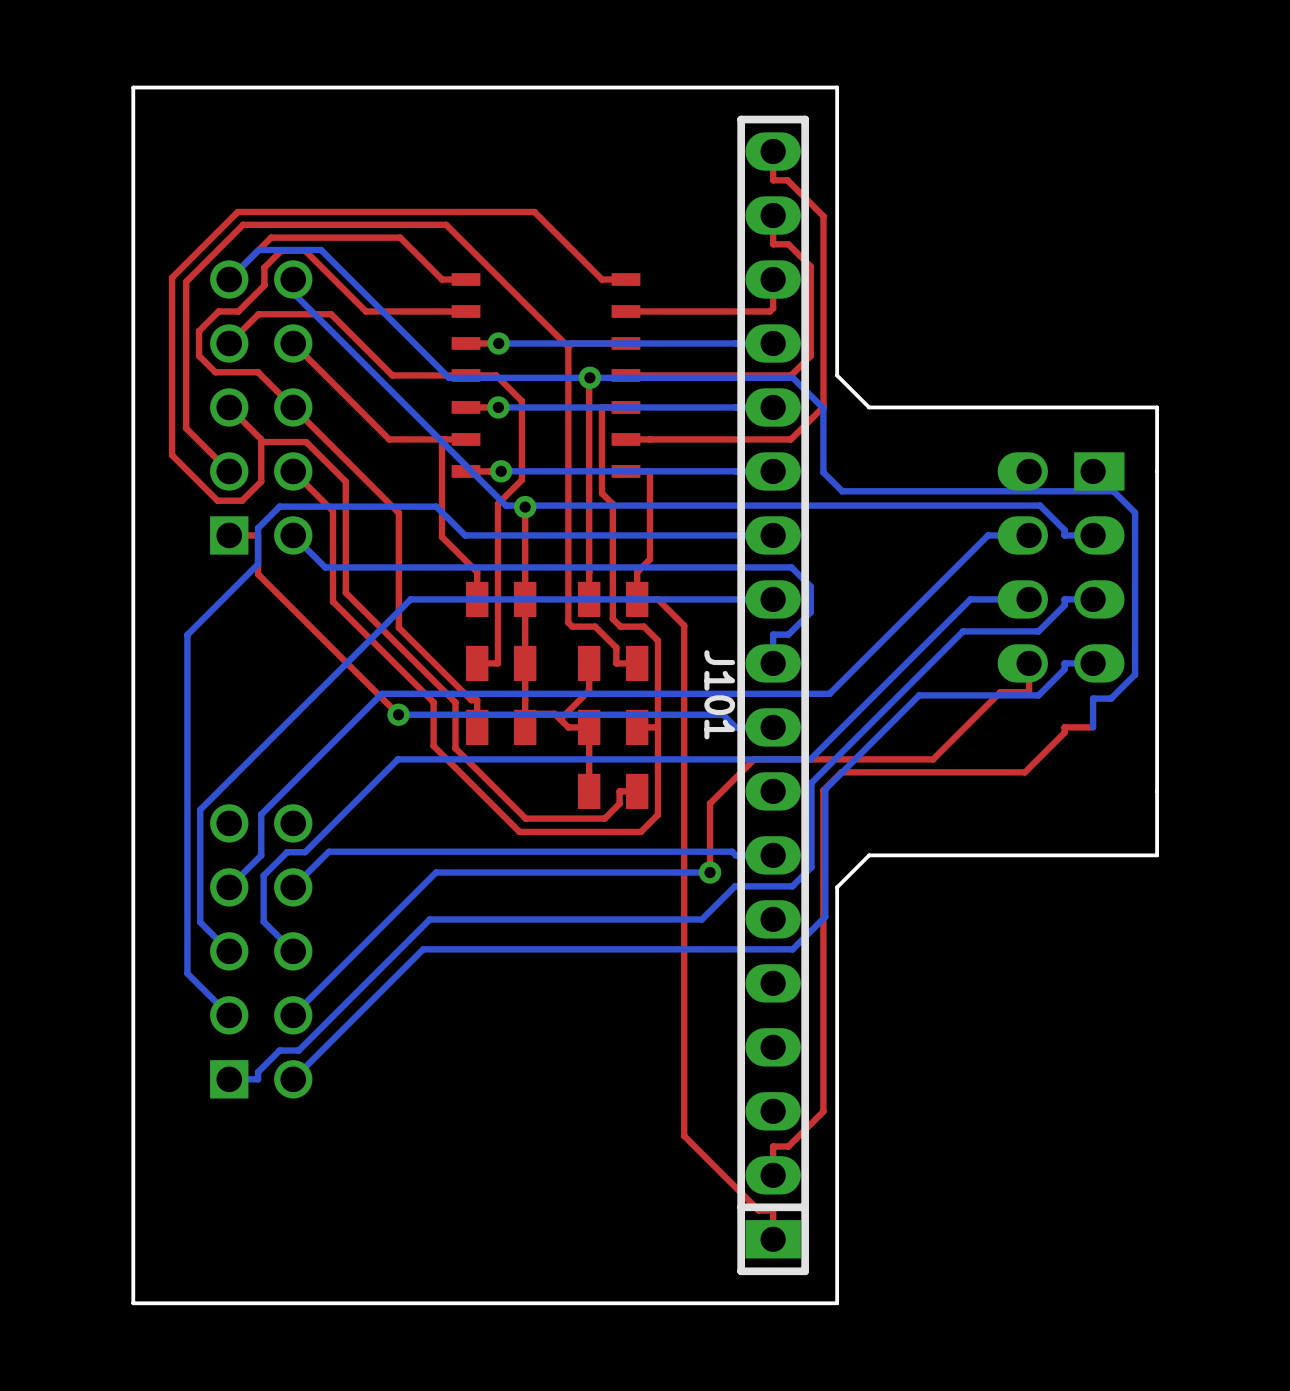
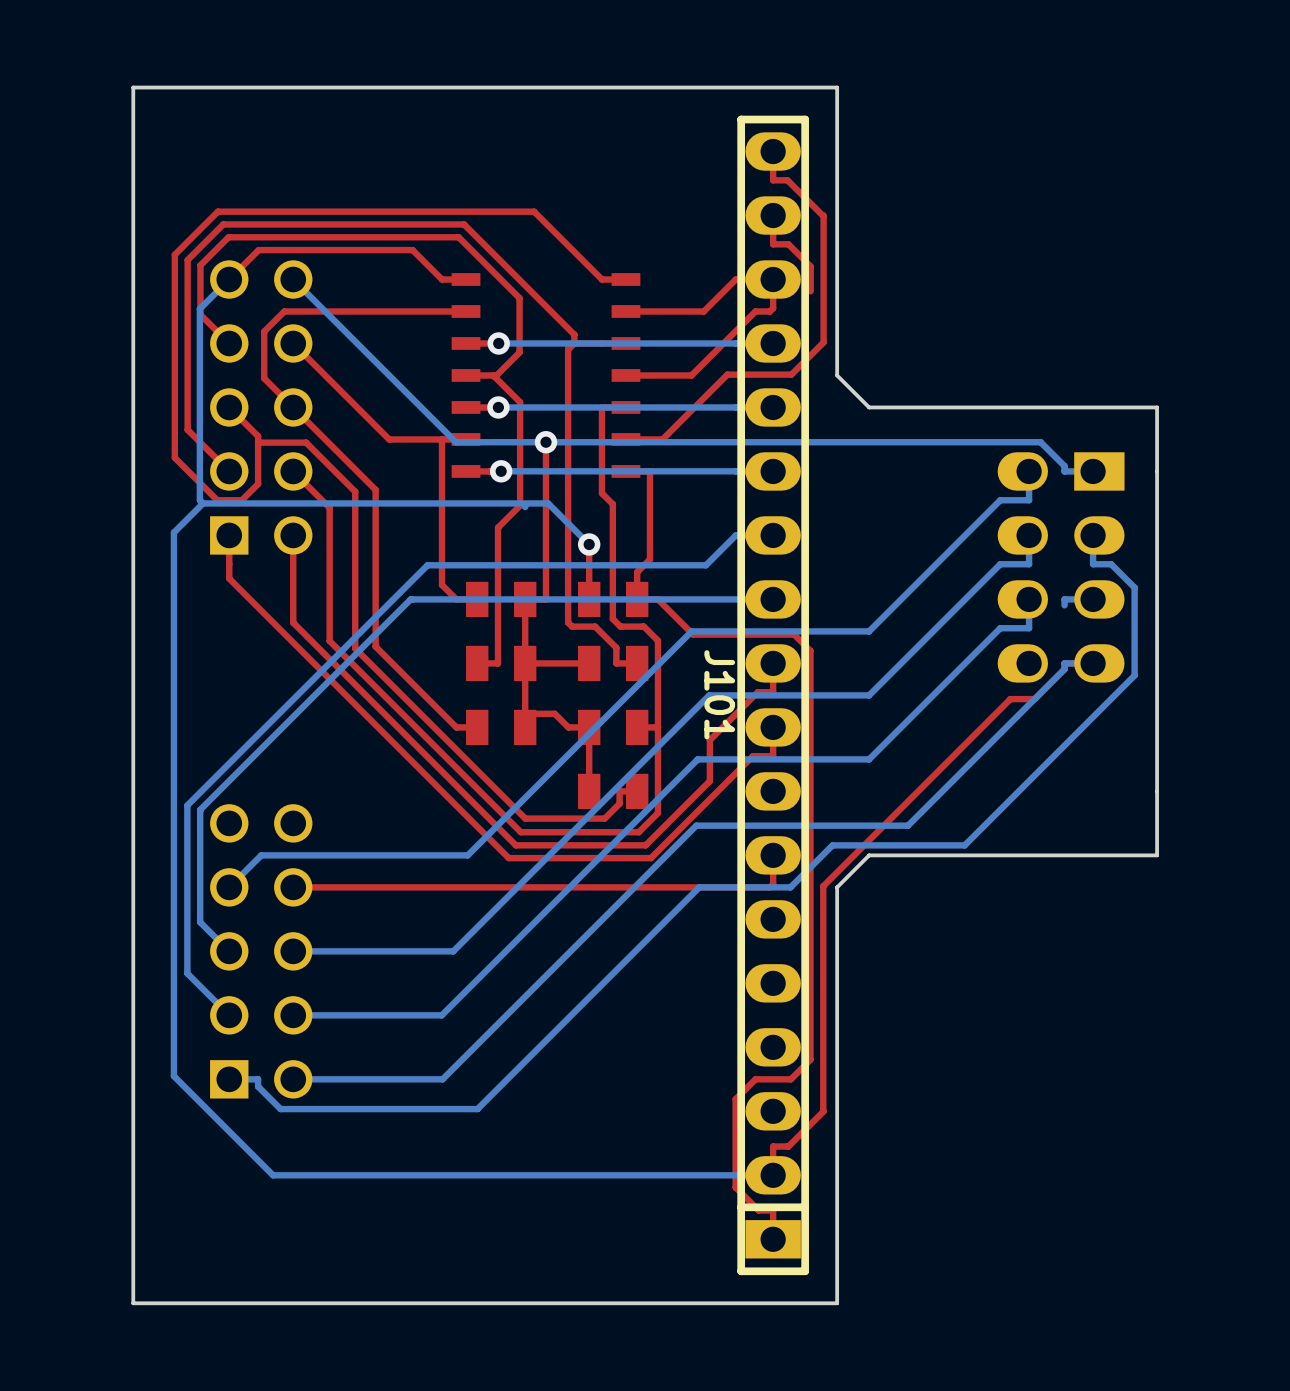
top track: (534, 212) (237, 212) (172, 277) (172, 455) (217, 500) (242, 500) (261, 481) (261, 439) (258, 436) -> (534, 211) (217, 211) (174, 254) (174, 457) (217, 500) (241, 500) (258, 484) (258, 436)
top track: (458, 237) (446, 224) (243, 224) (186, 281) (187, 429) -> (458, 237) (228, 237) (200, 265) (200, 314) (229, 343)
top track: (412, 250) (400, 237) (271, 237) (258, 250) -> (412, 250) (258, 250)
bottom track: (229, 279) (258, 250) (321, 250) (448, 377) (792, 377) (823, 408) (823, 472) (842, 491) (1113, 491) (1135, 512) (1135, 674) (1111, 698) (1093, 698) (1093, 727) -> (229, 279) (199, 308) (199, 500) (203, 503)
bottom track: (293, 279) (293, 292) (505, 505) (1040, 505) (1064, 530) (1064, 535) (1093, 535) -> (293, 279) (455, 442) (1040, 442) (1064, 466) (1064, 471) (1093, 471)
top track: (810, 291) (810, 355) (791, 375) (691, 375) -> (755, 311) (691, 375)
top track: (519, 298) (568, 346) (568, 622) (572, 626) -> (519, 298) (519, 352) (494, 377)
top track: (365, 311) (305, 250) (281, 250) (264, 267) (264, 285) (238, 311) (218, 311) (199, 331) (199, 355) (215, 372) (258, 372) (264, 378) -> (365, 311) (284, 311) (264, 331) (264, 378)
top track: (755, 311) (703, 311) -> (773, 279) (735, 279) (703, 311)
top track: (823, 342) (823, 406) (790, 439) (662, 439) -> (823, 342) (791, 374) (727, 374) (662, 439)
top track: (229, 343) (258, 314) (331, 314) (392, 375) (466, 375) -> none
top track: (493, 375) (496, 375) (521, 401) (521, 479) (498, 503) (498, 527) -> (493, 375) (520, 402) (520, 505) (498, 527)
via: (589, 377) -> none
top track: none -> (187, 429) (187, 260) (223, 224) (464, 224) (574, 334) (574, 343) (568, 349) (568, 622) (572, 626)
top track: (261, 442) (306, 442) (345, 481) (345, 592) (455, 702) (455, 748) (525, 818) -> (258, 442) (306, 442) (355, 491) (355, 648) (525, 818)
via: none -> (546, 442)
top track: (375, 489) (398, 513) (398, 627) (471, 700) (477, 700) (477, 727) -> (375, 489) (375, 646) (456, 727) (477, 727)
bottom track: none -> (203, 503) (173, 532) (173, 1076) (273, 1175) (773, 1175)
bottom track: none -> (203, 503) (548, 503) (589, 544)
top track: (329, 507) (332, 511) (332, 601) (433, 702) (433, 745) (519, 831) (640, 831) (657, 813) -> (329, 507) (329, 641) (520, 832) (638, 832) (657, 813)
top track: (525, 507) (525, 599) -> (546, 442) (546, 599) (525, 599)
via: (525, 507) -> none
top track: (229, 535) (258, 535) (258, 574) (398, 714) -> (229, 535) (229, 578) (508, 858) (650, 858) (752, 756) (773, 756) (773, 727)
top track: none -> (293, 535) (293, 622) (515, 845) (645, 845) (709, 781) (709, 740) (757, 692) (773, 692) (773, 663)
bottom track: (293, 535) (325, 567) (791, 567) (810, 586) (810, 612) (788, 634) (773, 634) (773, 663) -> none
bottom track: (735, 535) (465, 535) (436, 506) (279, 506) (258, 528) (258, 564) (187, 634) (187, 805) -> (735, 535) (705, 565) (427, 565) (187, 805)
bottom track: (1029, 535) (988, 535) (829, 693) (381, 693) (261, 814) (261, 855) -> (1029, 471) (1029, 500) (1000, 500) (869, 631) (691, 631) (467, 855) (261, 855)
bottom track: none -> (1029, 535) (1029, 564) (1000, 564) (869, 695) (709, 695) (453, 951) (293, 951)
top track: (442, 537) (477, 572) (477, 599) -> (442, 537) (442, 585) (456, 599) (477, 599)
via: none -> (589, 544)
bottom track: (1029, 599) (970, 599) (810, 759) -> (1029, 599) (1029, 628) (1000, 628) (869, 759) (810, 759)
bottom track: (1064, 605) (1038, 631) (963, 631) (811, 782) (811, 867) (792, 886) (735, 886) (701, 919) (429, 919) (298, 1050) (279, 1050) (258, 1072) (258, 1079) -> (1093, 535) (1093, 564) (1111, 564) (1134, 587) (1134, 675) (964, 845) (832, 845) (790, 887) (699, 887) (477, 1109) (280, 1109) (258, 1086) (258, 1079)
top track: (684, 625) (684, 1135) (735, 1187) -> (684, 625) (693, 634) (794, 634) (810, 650) (810, 1059) (790, 1079) (755, 1079) (735, 1099) (735, 1187)
top track: (589, 663) (589, 690) (560, 719) -> (589, 663) (525, 663)
top track: (1029, 663) (1029, 692) (1000, 692) (933, 759) (754, 759) (710, 803) (710, 872) -> none
bottom track: (1038, 695) (919, 695) (825, 789) (825, 916) (792, 949) (423, 949) (293, 1079) -> (1038, 695) (908, 825) (696, 825) (442, 1079) (293, 1079)
bottom track: (398, 714) (723, 714) (735, 727) (773, 727) -> none
via: (398, 714) -> none
top track: (1093, 727) (1064, 727) (1064, 732) (1024, 772) (841, 772) (823, 790) (823, 886) -> (1093, 663) (1064, 663) (1064, 669) (1034, 699) (1010, 699) (823, 886)
bottom track: (697, 759) (397, 759) (305, 852) (287, 852) (263, 875) (263, 921) (293, 951) -> (697, 759) (441, 1015) (293, 1015)
top track: none -> (773, 855) (773, 884) (769, 887) (293, 887)
bottom track: (773, 855) (735, 855) (732, 851) (328, 851) (293, 887) -> none
bottom track: (710, 872) (436, 872) (293, 1015) -> none
via: (710, 872) -> none

